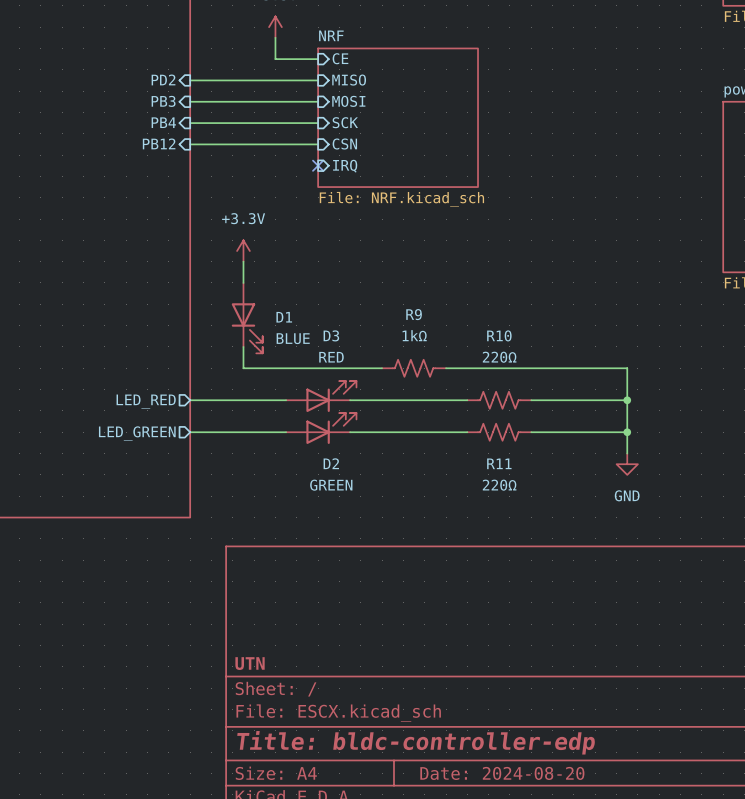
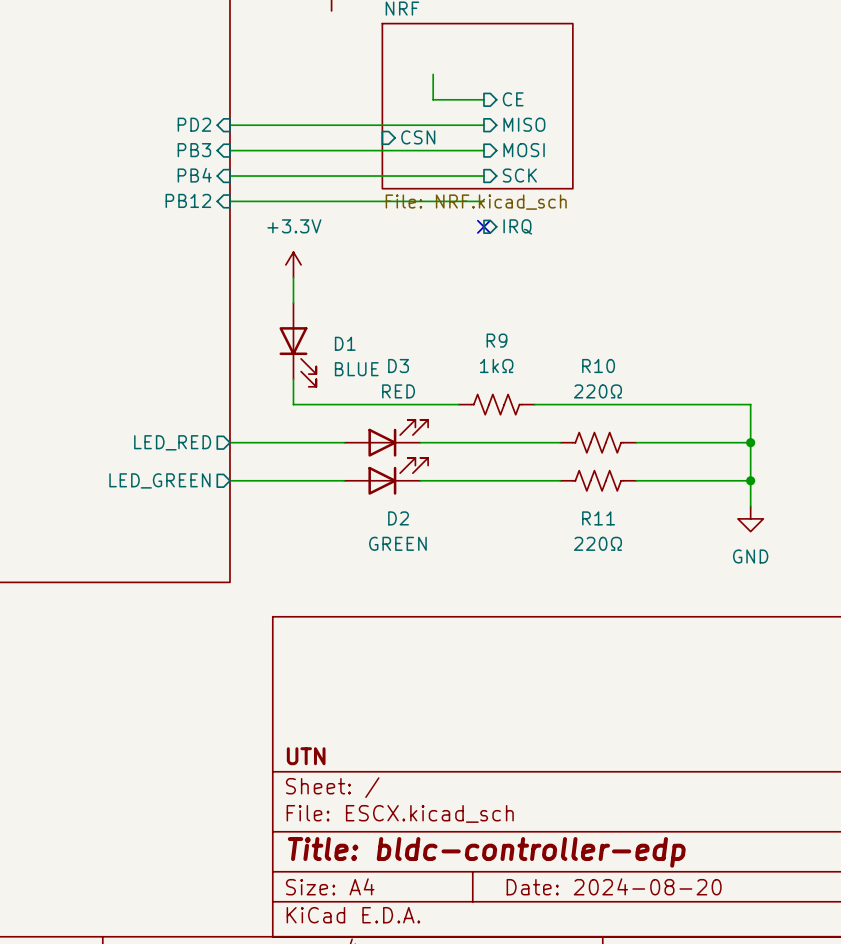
wire: (275, 37) (275, 59) (318, 59) -> (433, 74) (433, 99) (483, 99)
sheet pin position: CE (340, 58) -> CE (513, 99)
sheet pin position: PD2 (163, 79) -> PD2 (194, 124)
wire: (190, 80) (318, 80) -> none
sheet pin position: MISO (349, 80) -> MISO (524, 124)
sheet pin position: PB3 (163, 101) -> PB3 (194, 150)
wire: (190, 101) (318, 101) -> none
sheet pin position: MOSI (348, 101) -> MOSI (524, 150)
sheet pin position: PB4 (163, 122) -> PB4 (194, 175)
sheet pin position: SCK (345, 122) -> SCK (519, 175)
wire: (190, 123) (318, 123) -> none
wire: none -> (229, 125) (483, 125)
sheet pin position: PB12 (159, 143) -> PB12 (188, 200)
wire: (190, 144) (318, 144) -> none
wire: none -> (229, 150) (483, 150)
no-connect mark: (318, 165) -> none
sheet pin position: IRQ (345, 166) -> IRQ (517, 226)
wire: none -> (229, 176) (483, 176)
wire: none -> (229, 201) (483, 201)
no-connect mark: none -> (483, 226)

